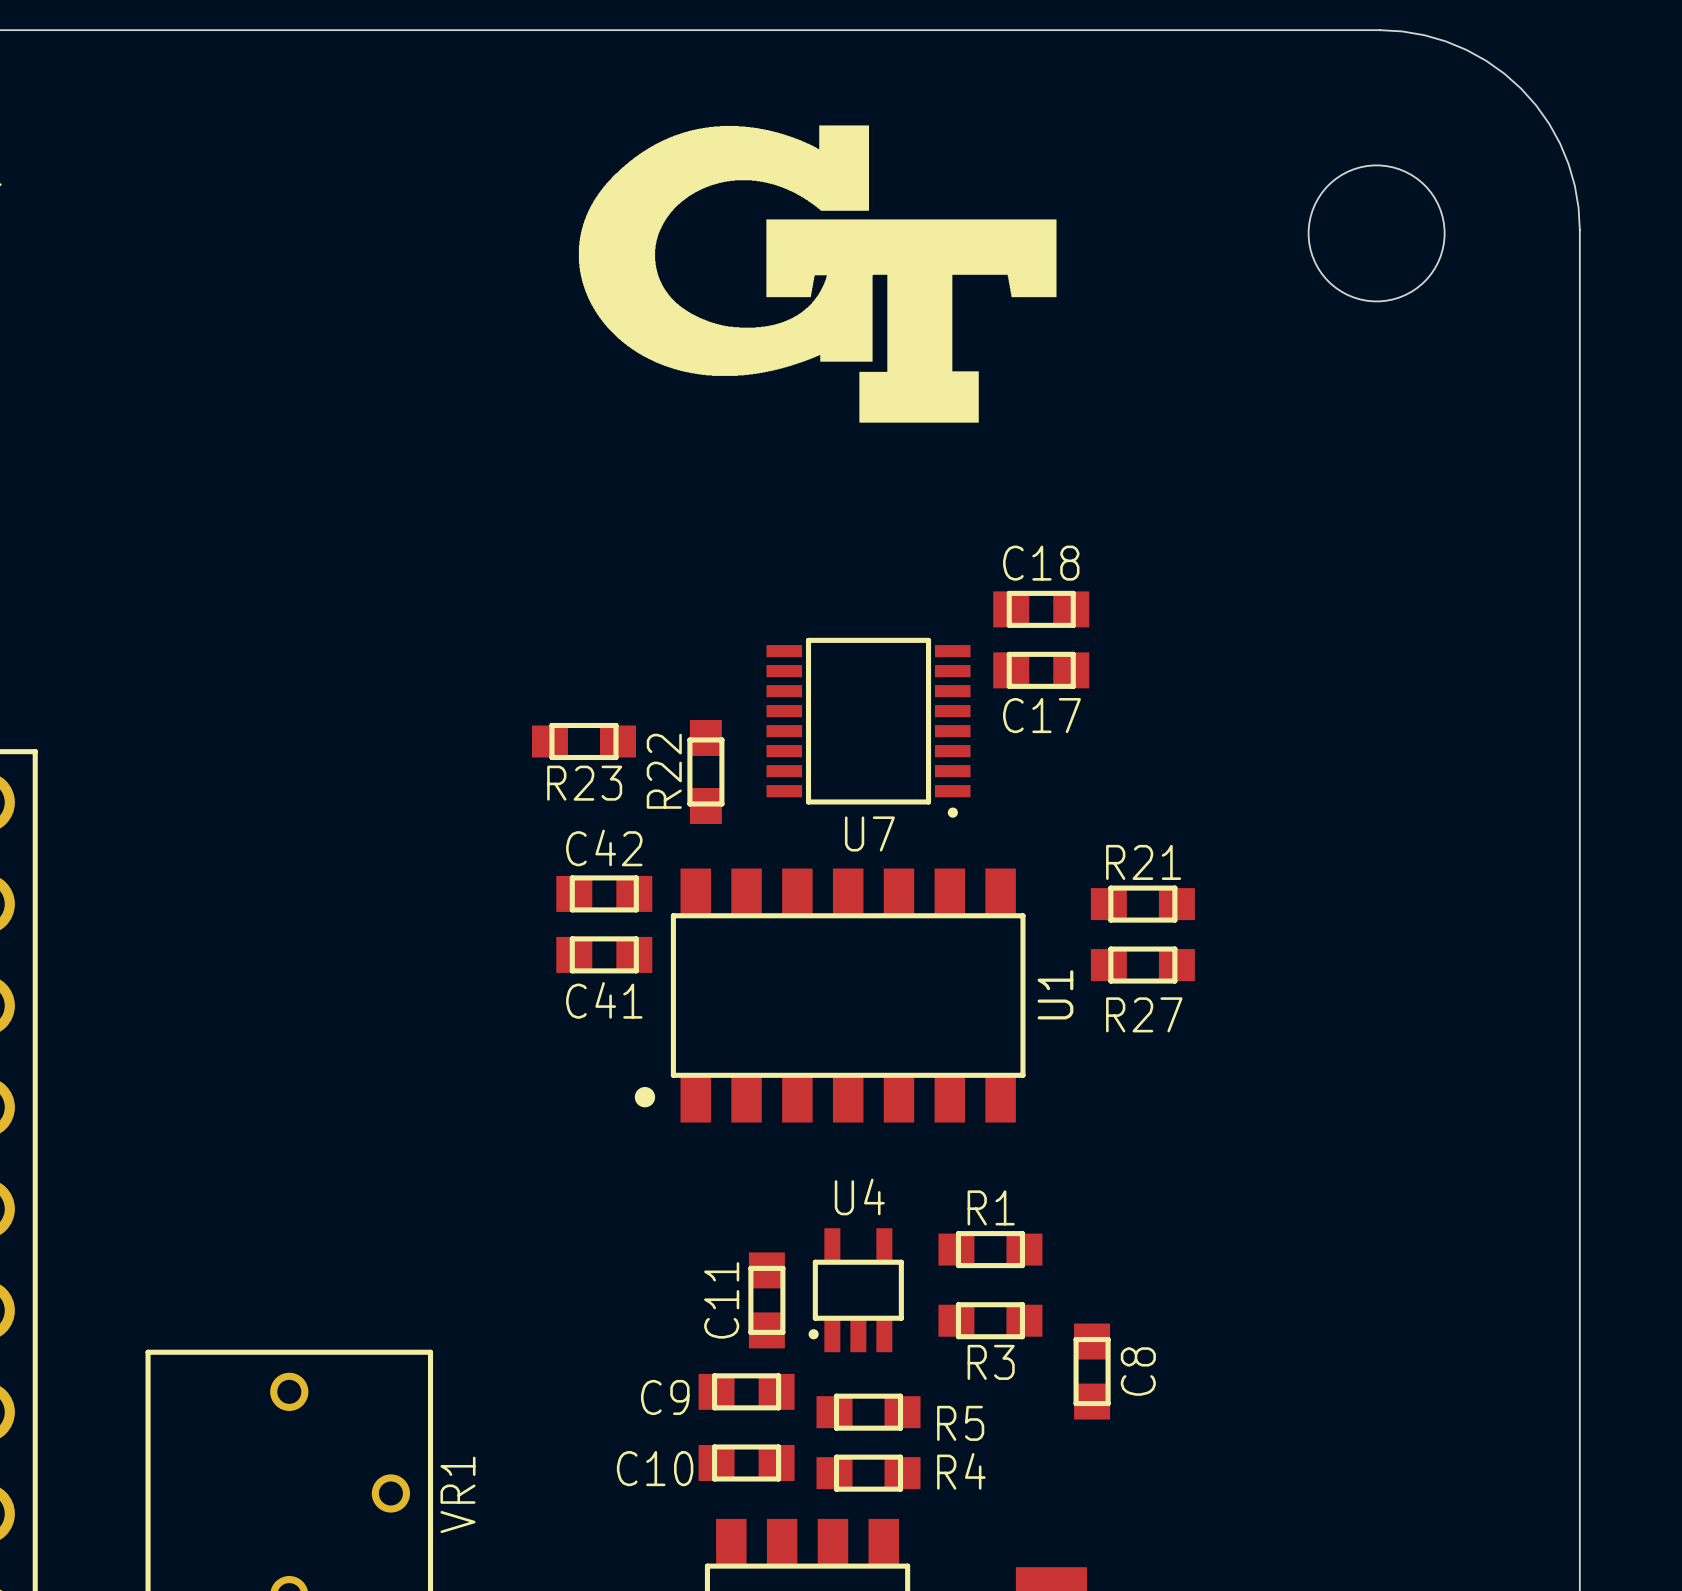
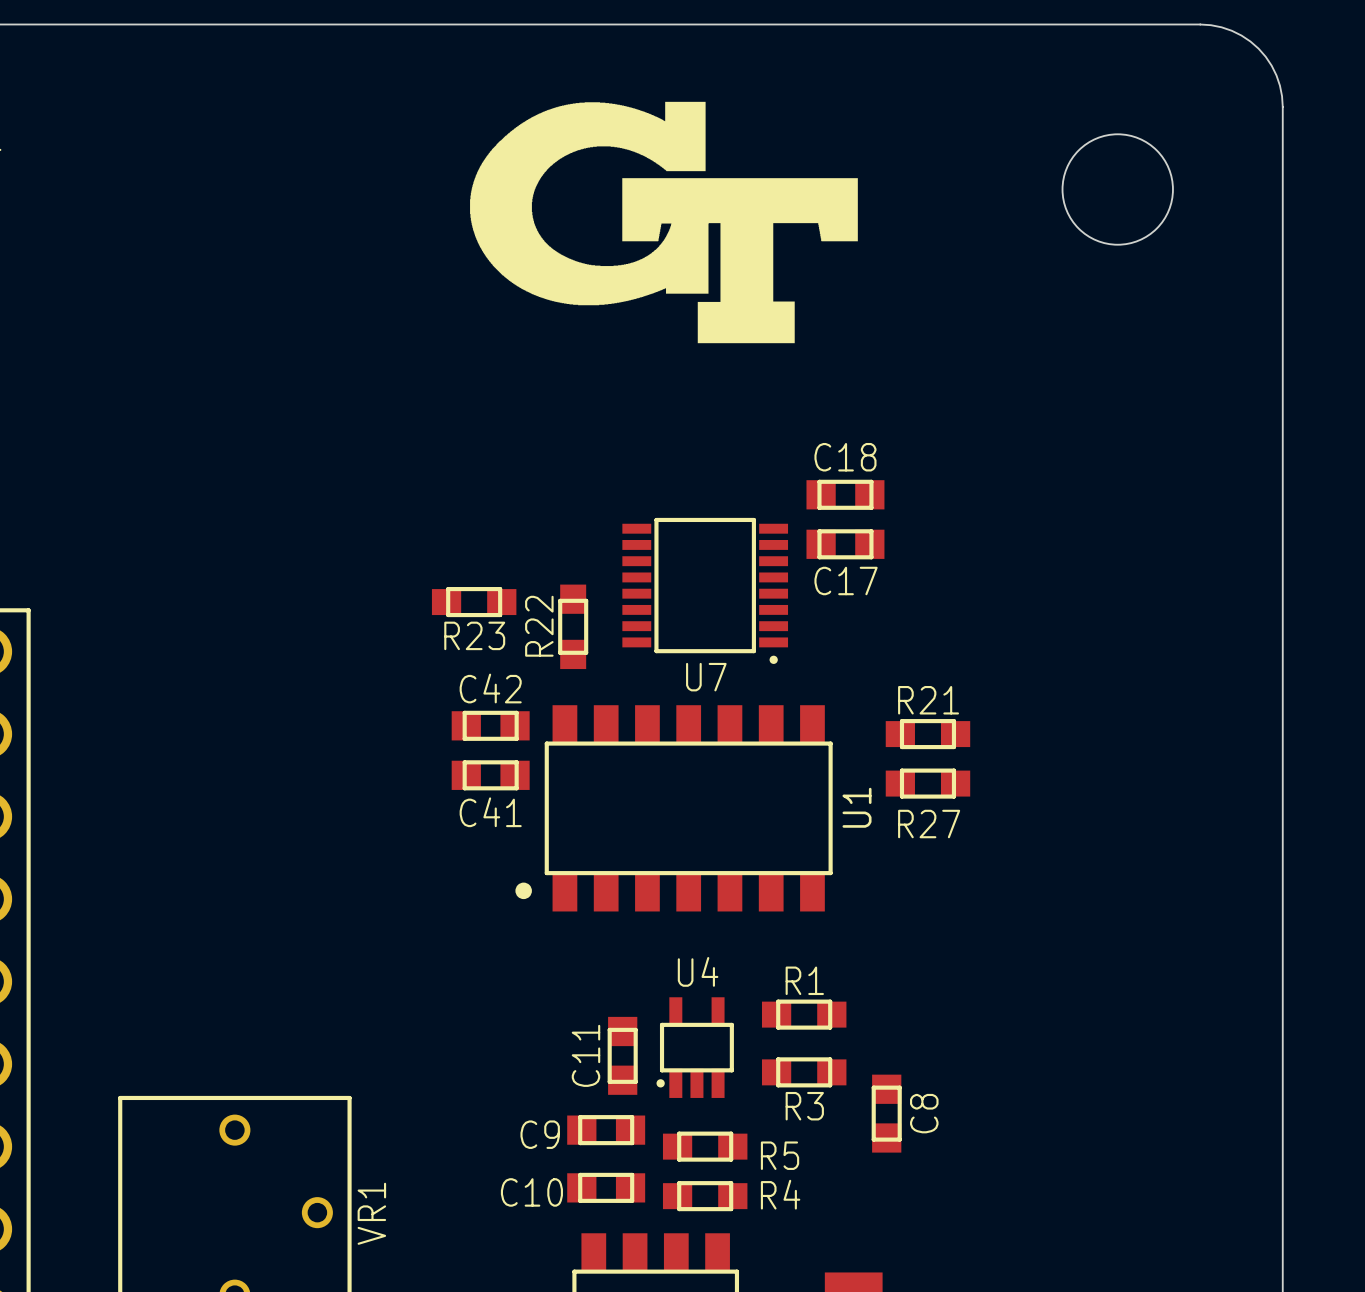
board edge: (1379, 30) (1402, 31) (1445, 41) (1486, 60) (1521, 88) (1549, 123) (1568, 164) (1578, 207) (1579, 230) -> (1120, 24) (1211, 25) (1231, 30) (1258, 48) (1276, 75) (1282, 96) (1282, 186)

